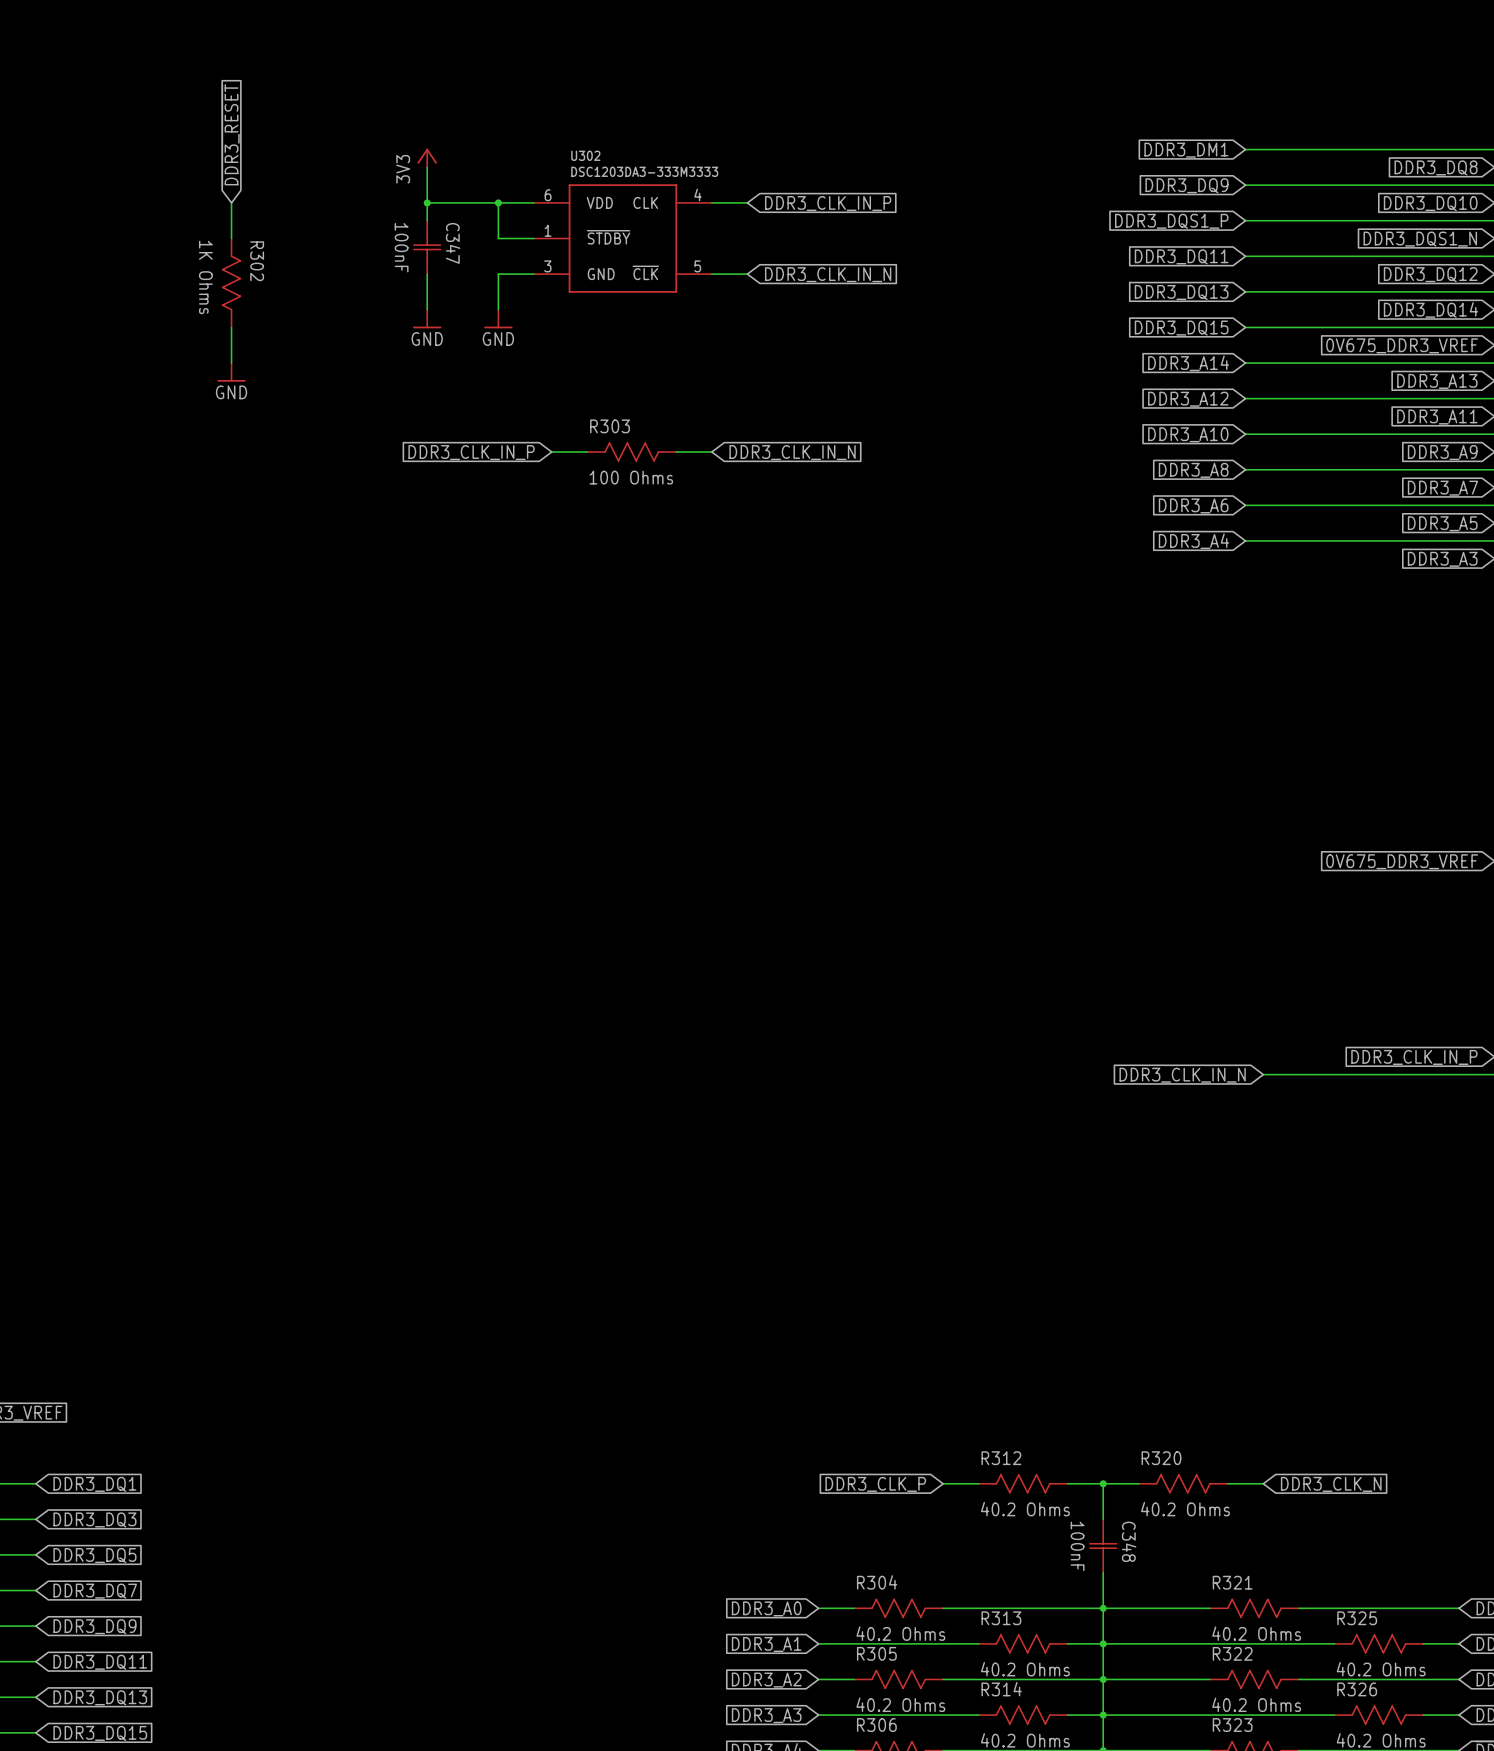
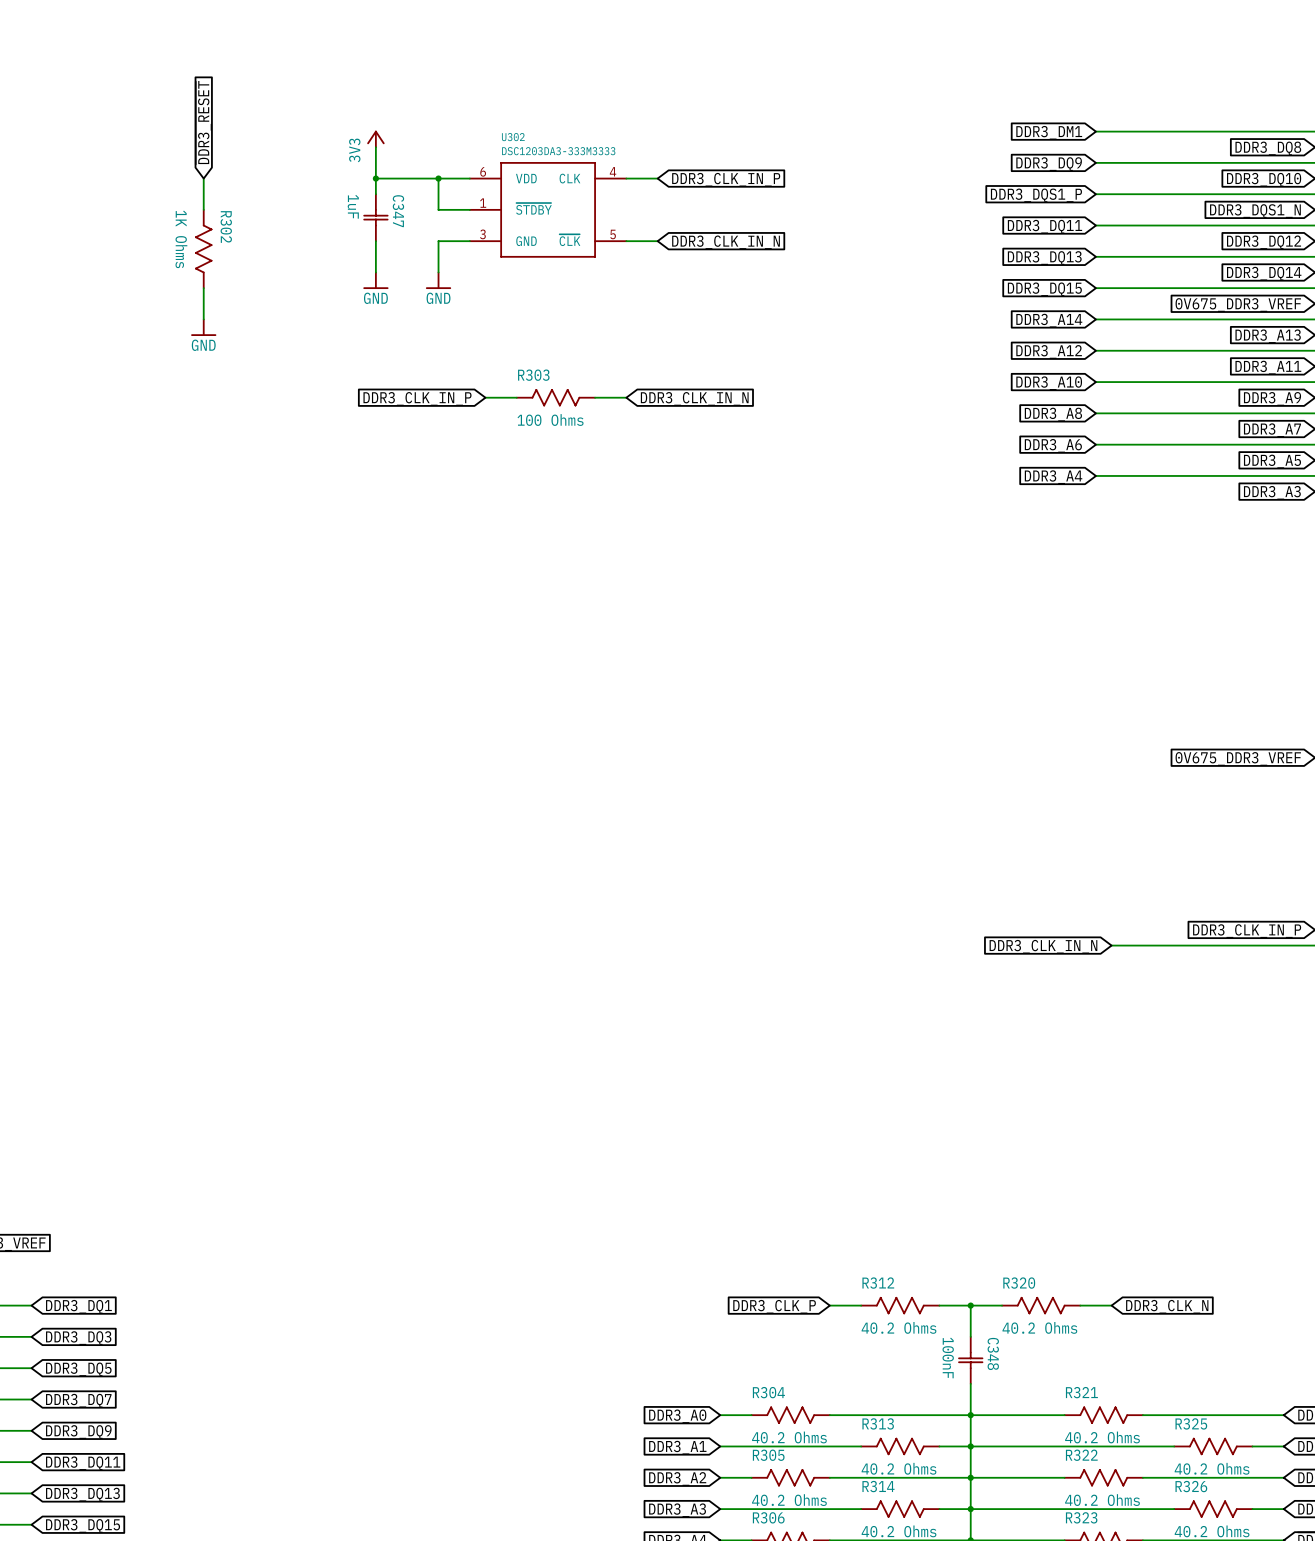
C347 value: 100nF (401, 247) -> 1uF (353, 206)

